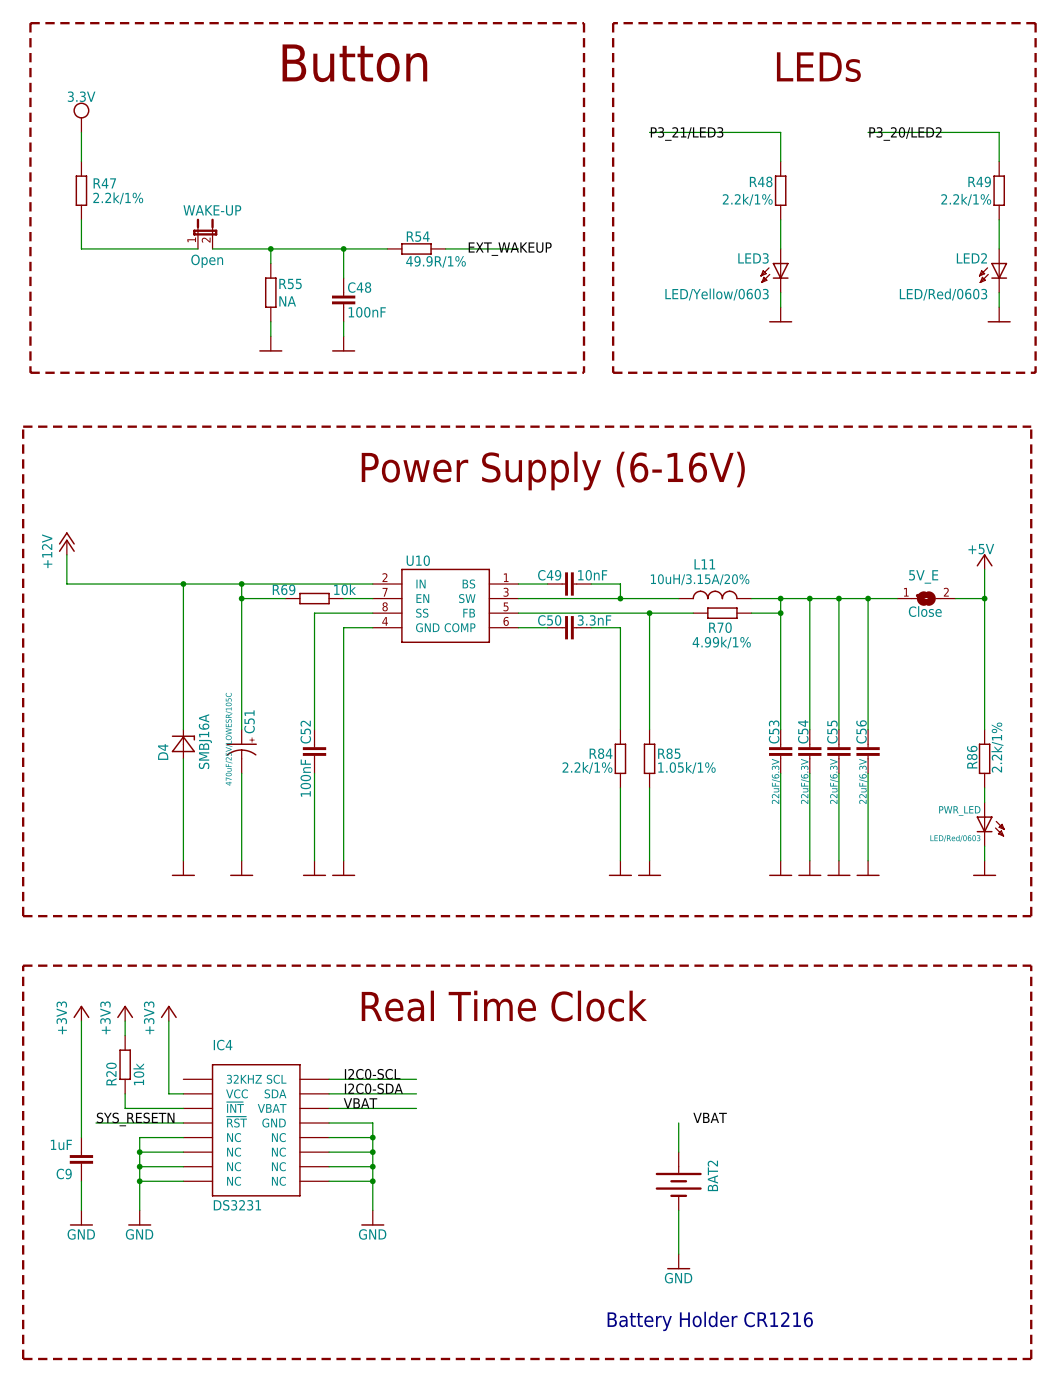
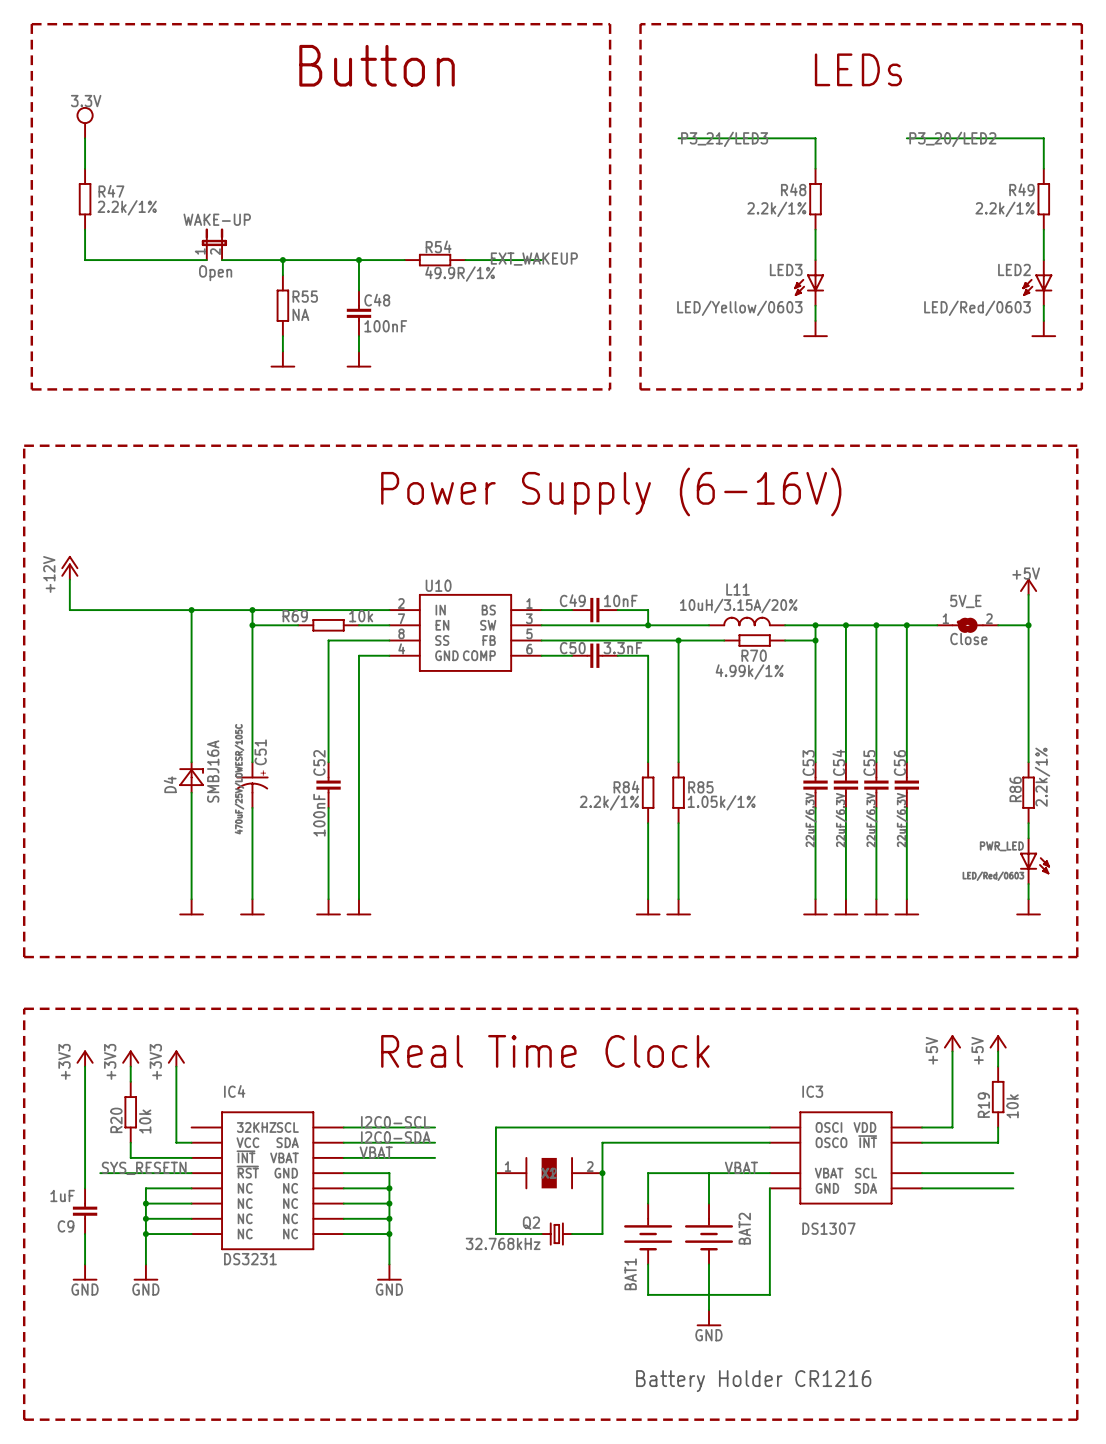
power symbol: none -> +5V (952, 1043)
power symbol: none -> +5V (998, 1043)
wire: none -> (952, 1051) (952, 1127) (922, 1127)
wire: none -> (998, 1051) (998, 1066)
R19: none -> 10k (998, 1097)
wire: none -> (769, 1127) (495, 1127) (495, 1234) (541, 1234)
wire: none -> (998, 1127) (998, 1142) (922, 1142)
wire: none -> (769, 1142) (602, 1142) (602, 1234) (572, 1234)
IC3: none -> DS1307 (845, 1157)
part: none -> (549, 1173)
junction: none -> (602, 1173)
wire: none -> (769, 1173) (648, 1173) (648, 1203)
wire: none -> (922, 1173) (1013, 1173)
wire: none -> (769, 1188) (769, 1294) (648, 1294) (648, 1264)
wire: none -> (922, 1188) (1013, 1188)
Q2: none -> 32.768kHz (556, 1234)
BAT1: none -> (648, 1234)

